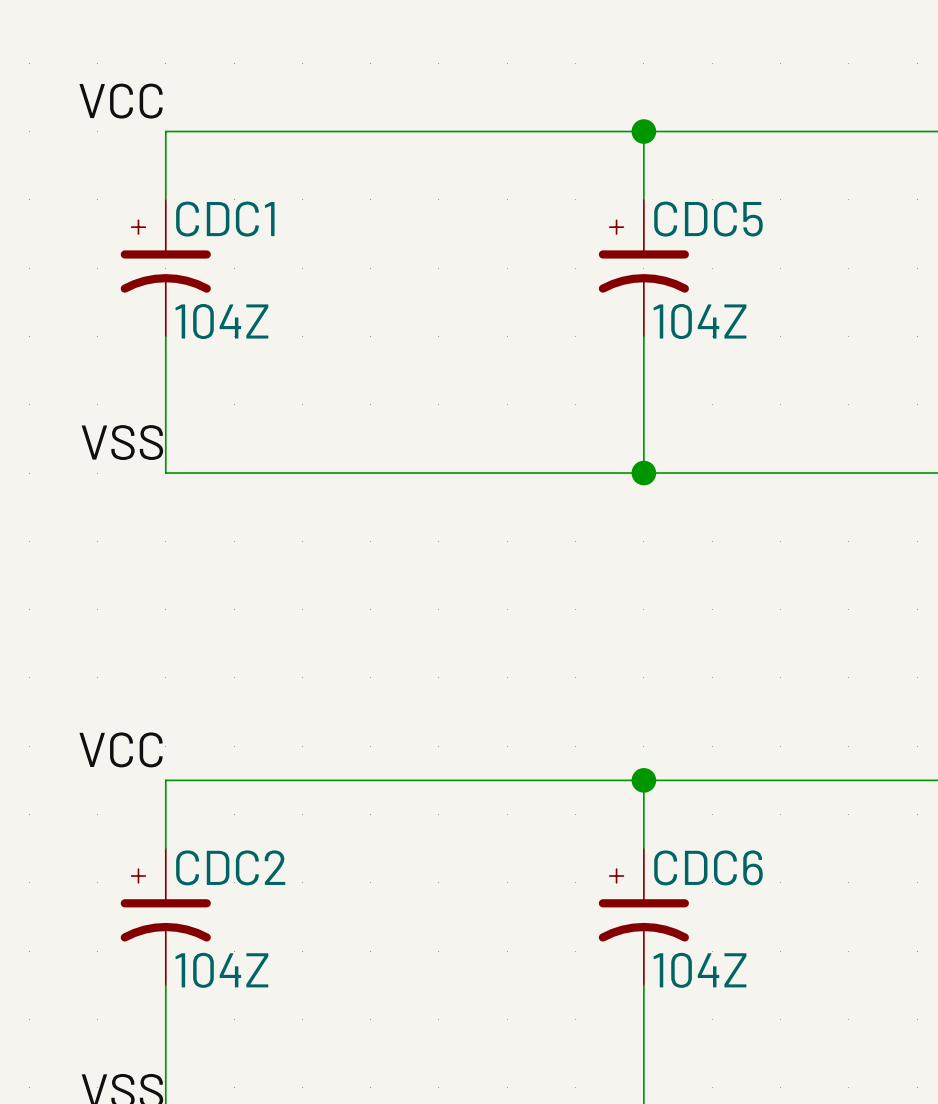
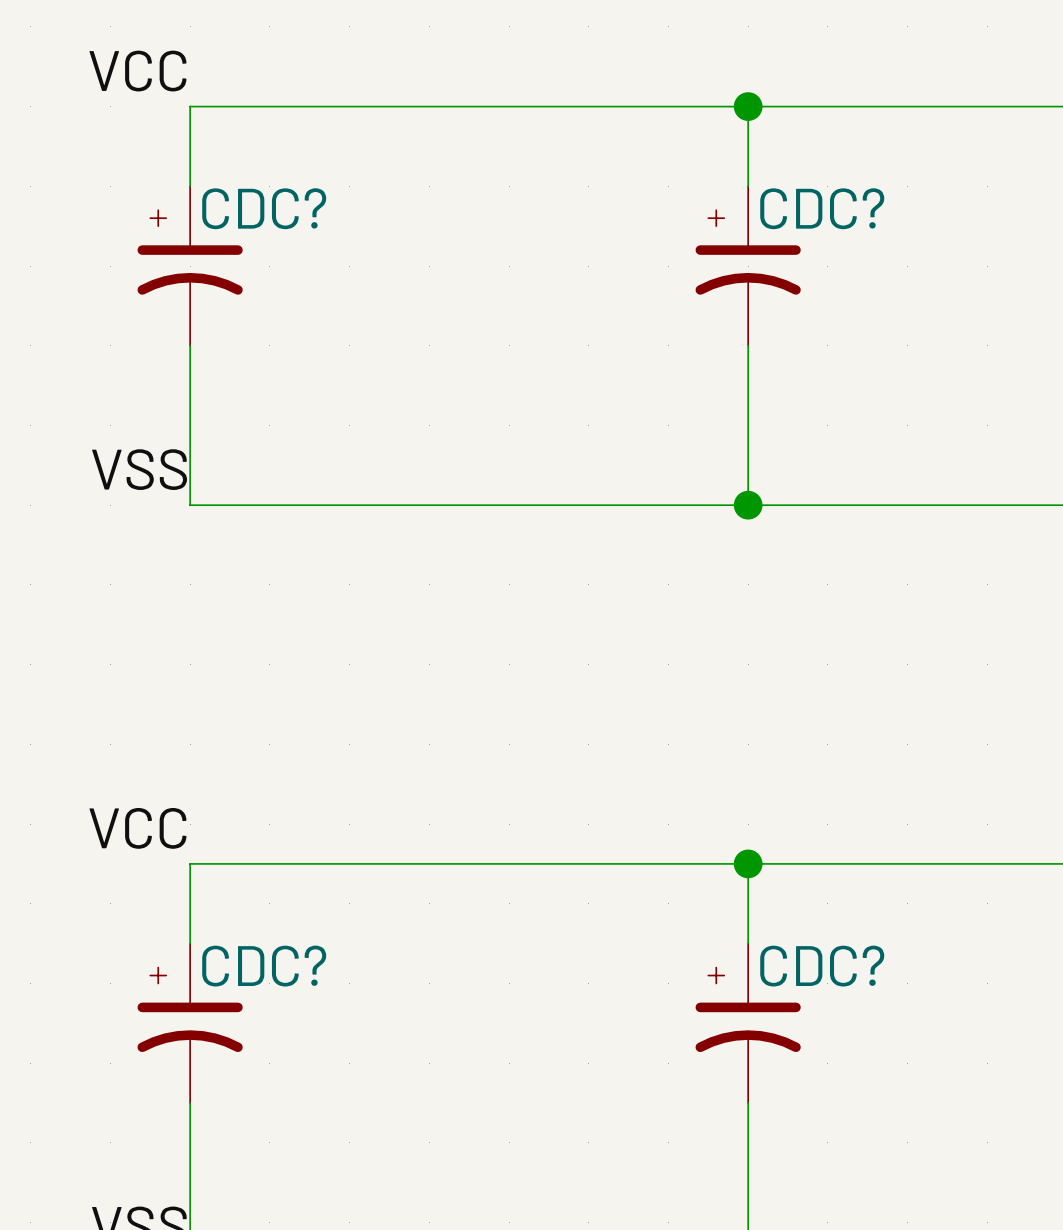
CDC1 name: CDC1 (225, 219) -> CDC? (264, 208)
CDC5 name: CDC5 (708, 219) -> CDC? (822, 208)
CDC1 value: 104Z (221, 321) -> none
CDC5 value: 104Z (699, 321) -> none
CDC2 name: CDC2 (230, 867) -> CDC? (264, 966)
CDC6 name: CDC6 (708, 867) -> CDC? (822, 966)
CDC2 value: 104Z (221, 970) -> none
CDC6 value: 104Z (699, 970) -> none

